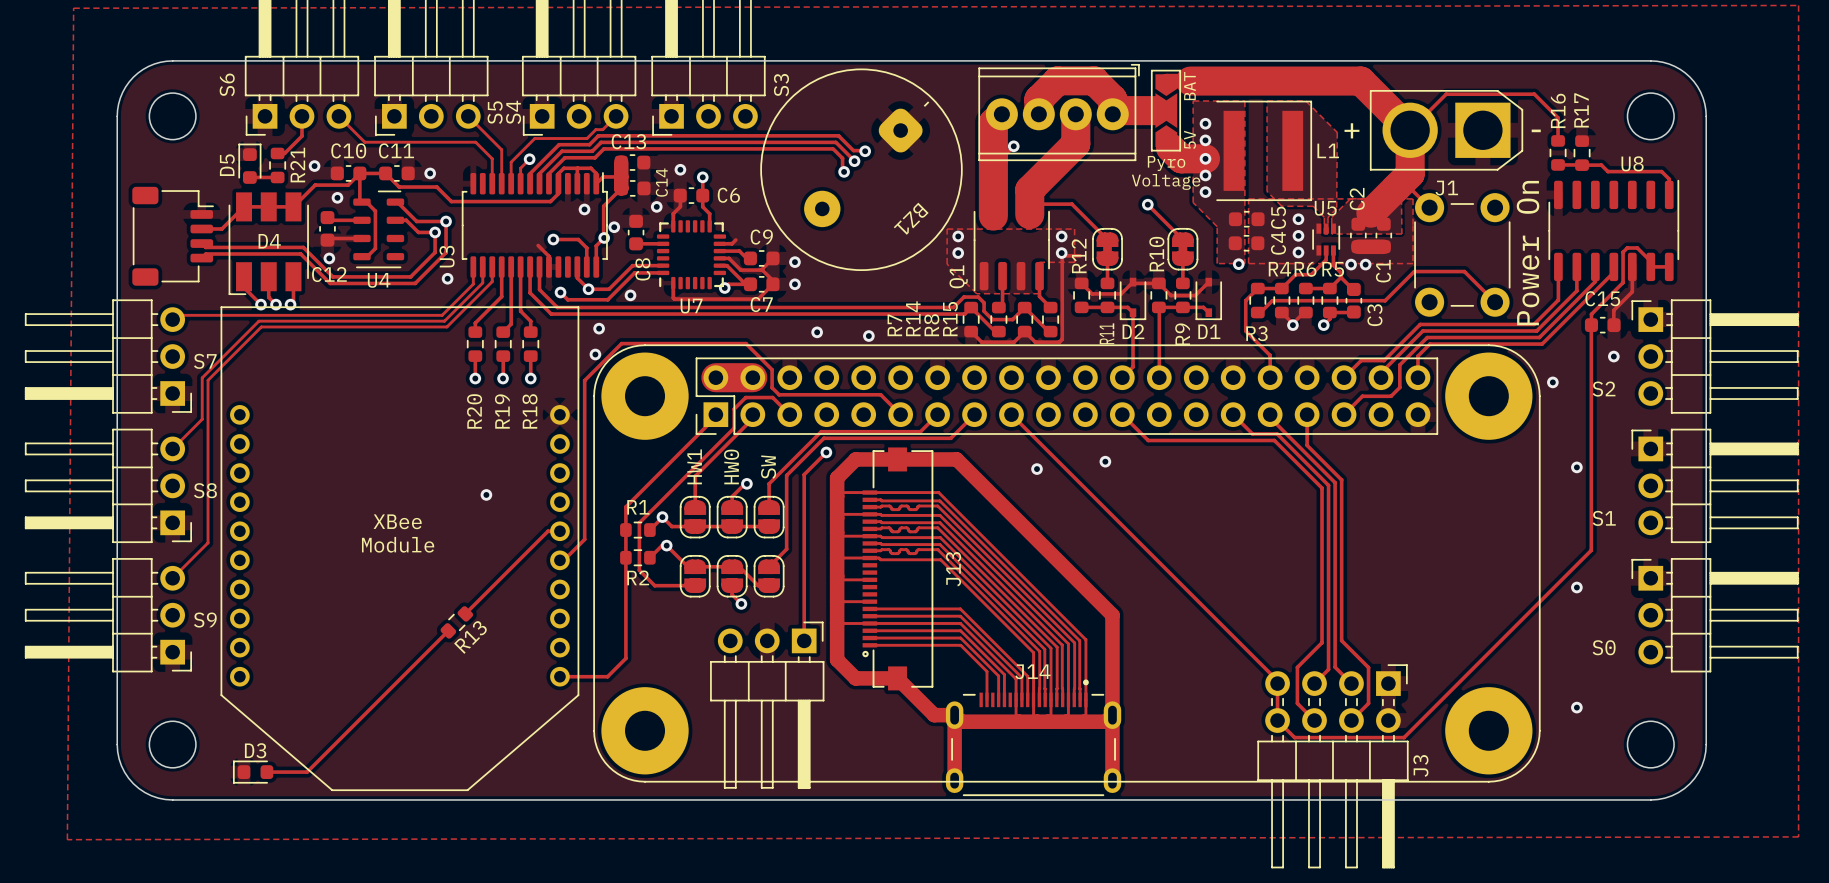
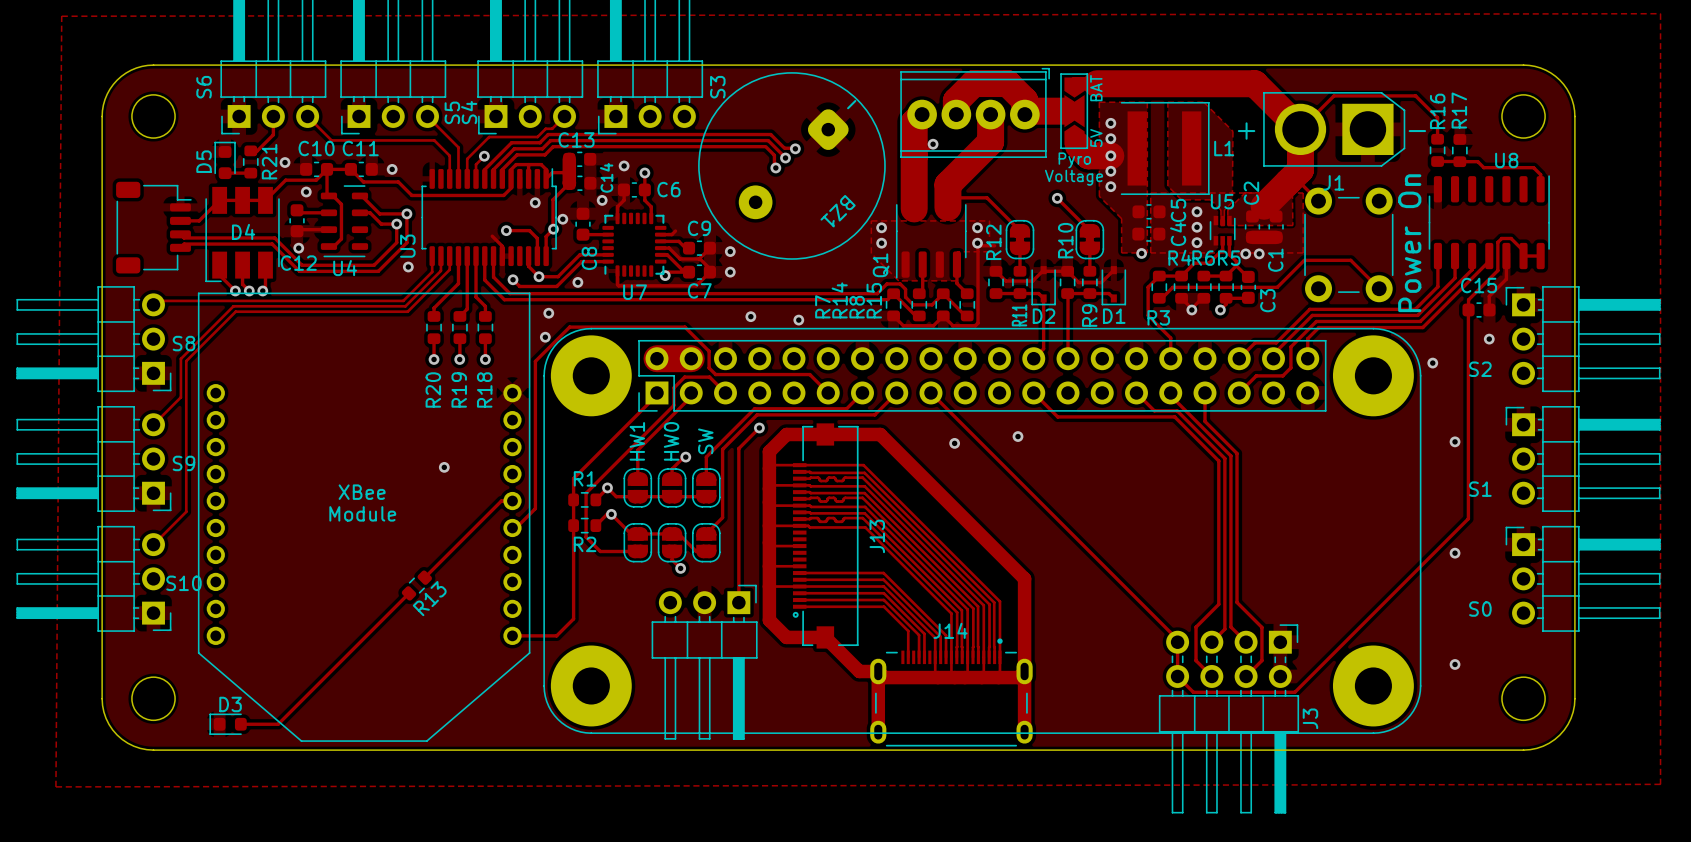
S7 name: S7 (205, 361) -> S8 (184, 343)
S8 name: S8 (205, 490) -> S9 (184, 463)
S9 name: S9 (205, 620) -> S10 (184, 583)

